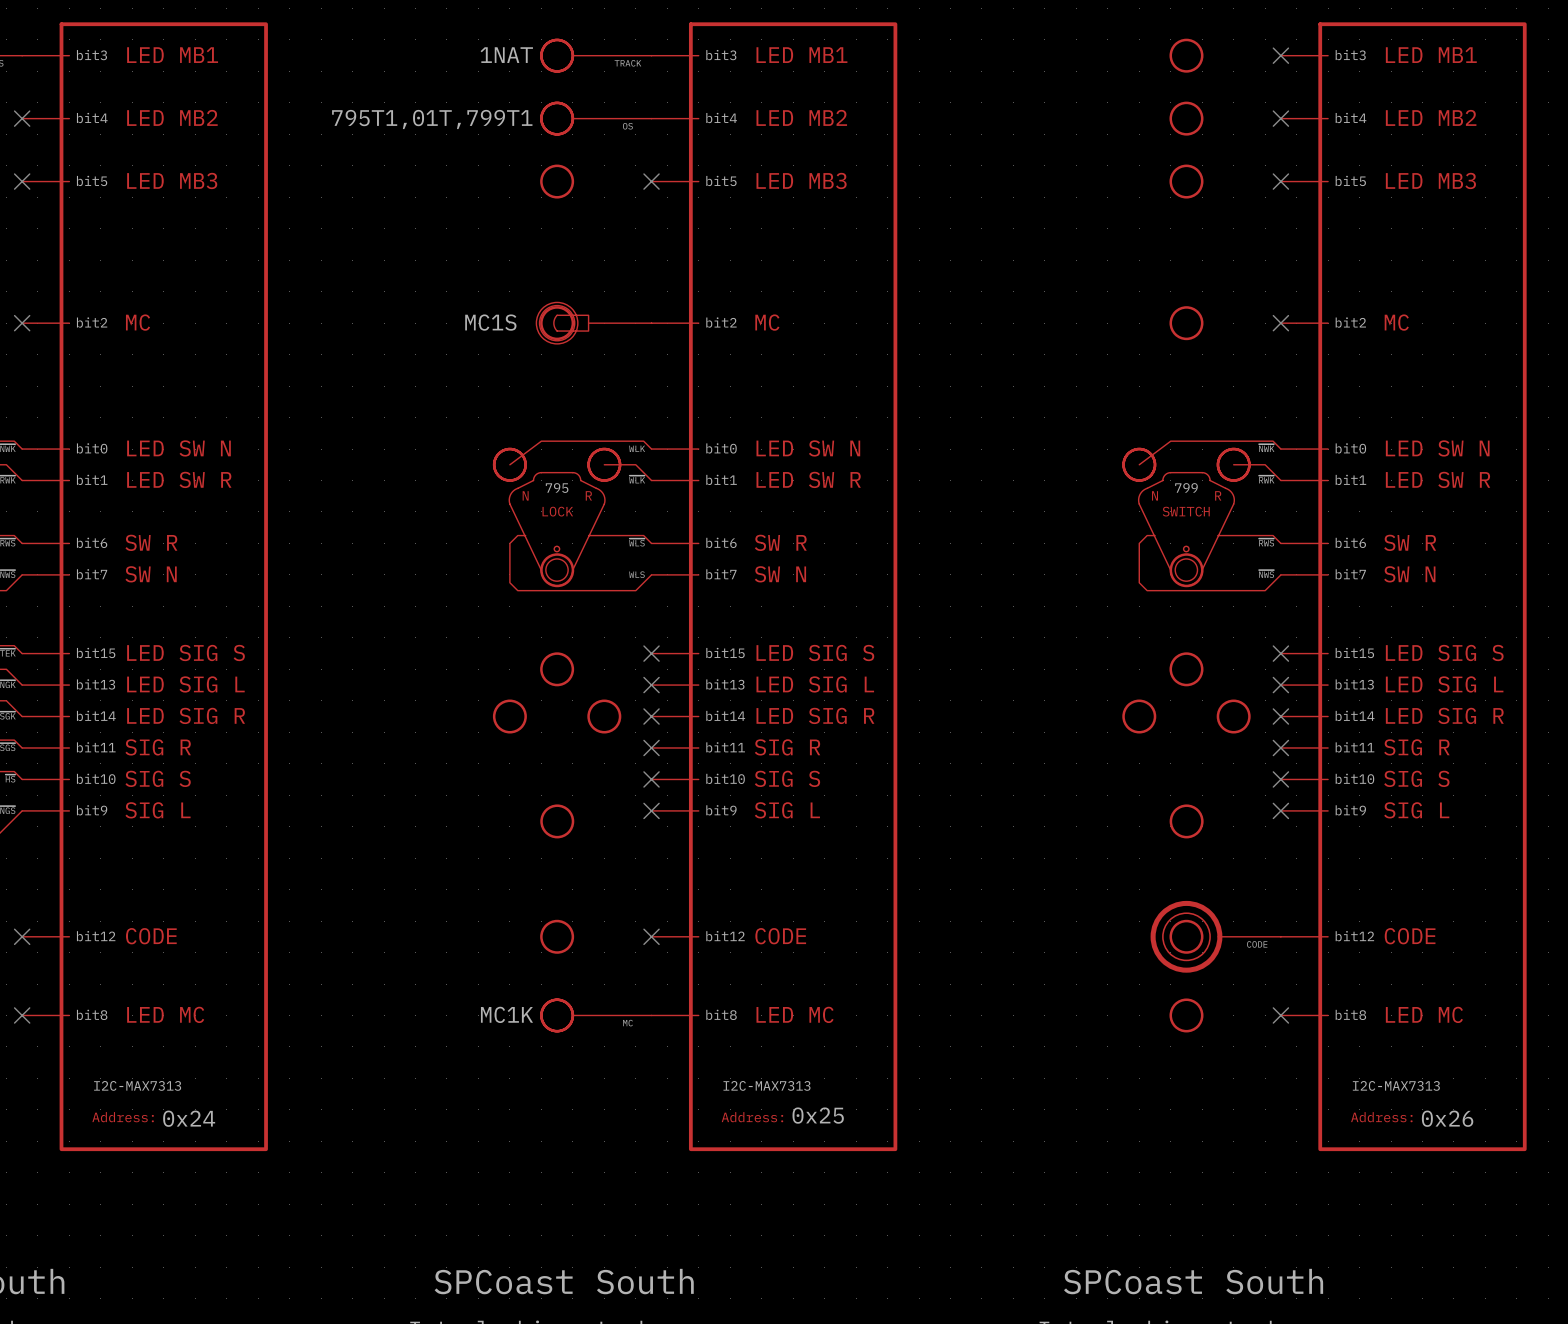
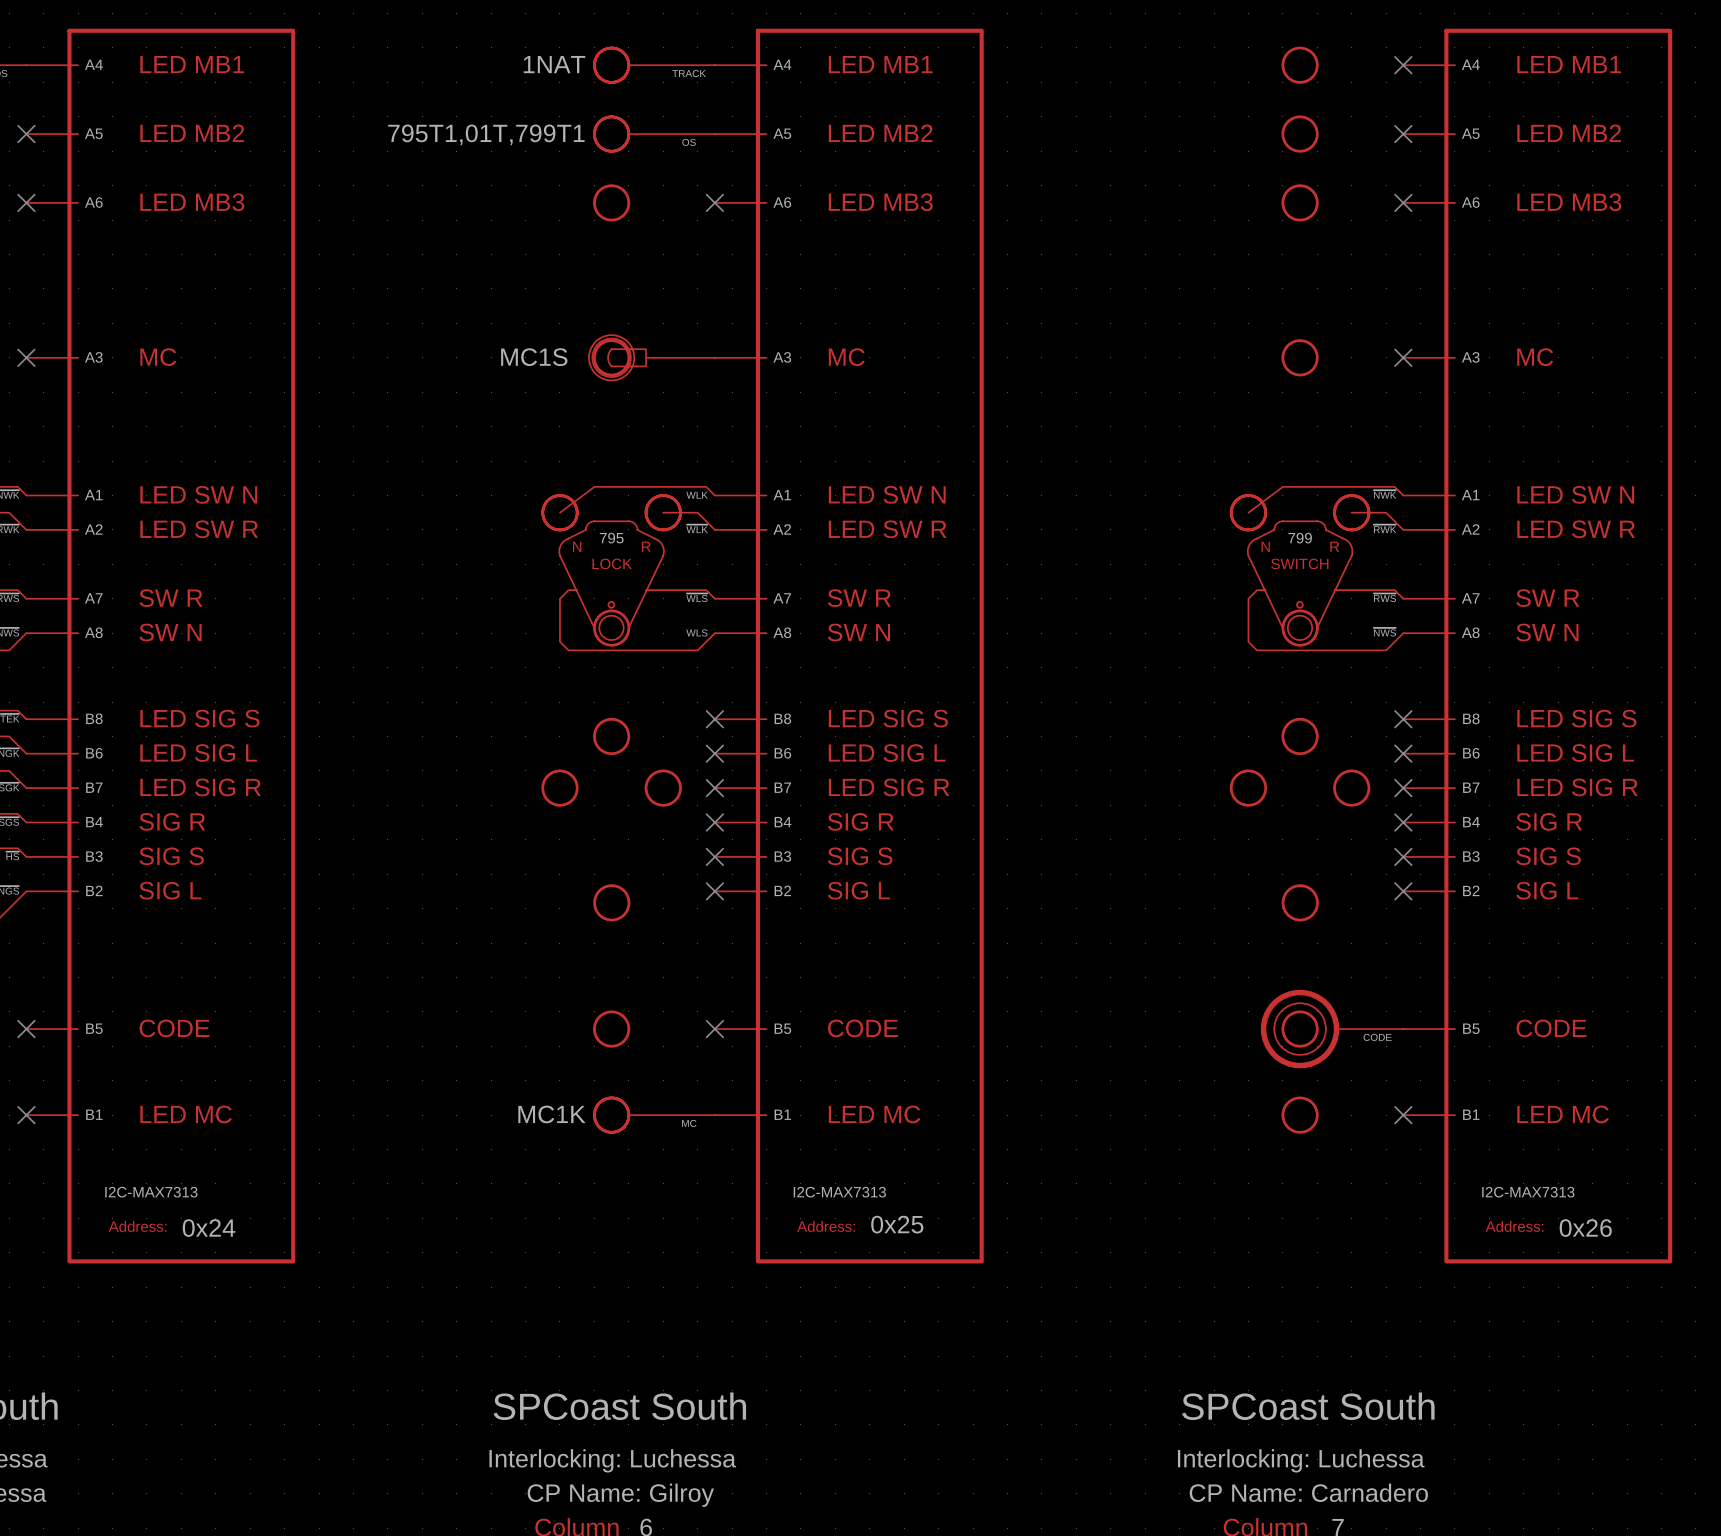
part symbol: [22, 22, 268, 1152] -> [26, 28, 296, 1264]
part symbol: [651, 22, 898, 1152] -> [714, 28, 984, 1264]
part symbol: [1280, 22, 1527, 1152] -> [1403, 28, 1673, 1264]

